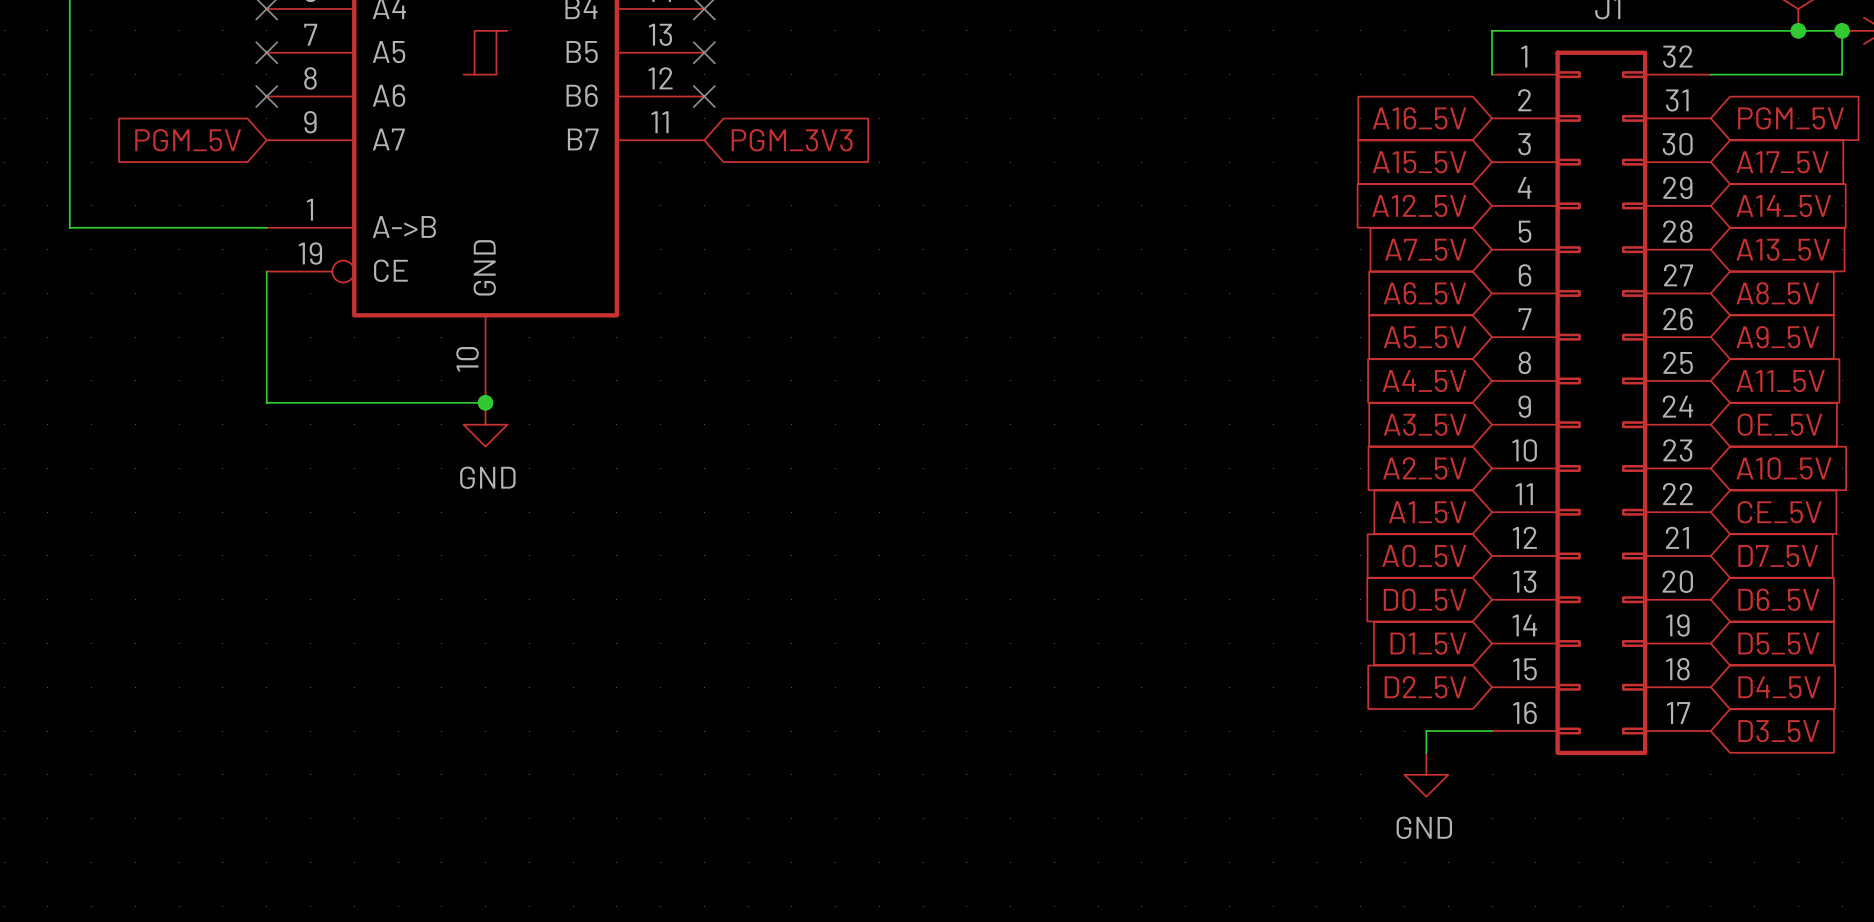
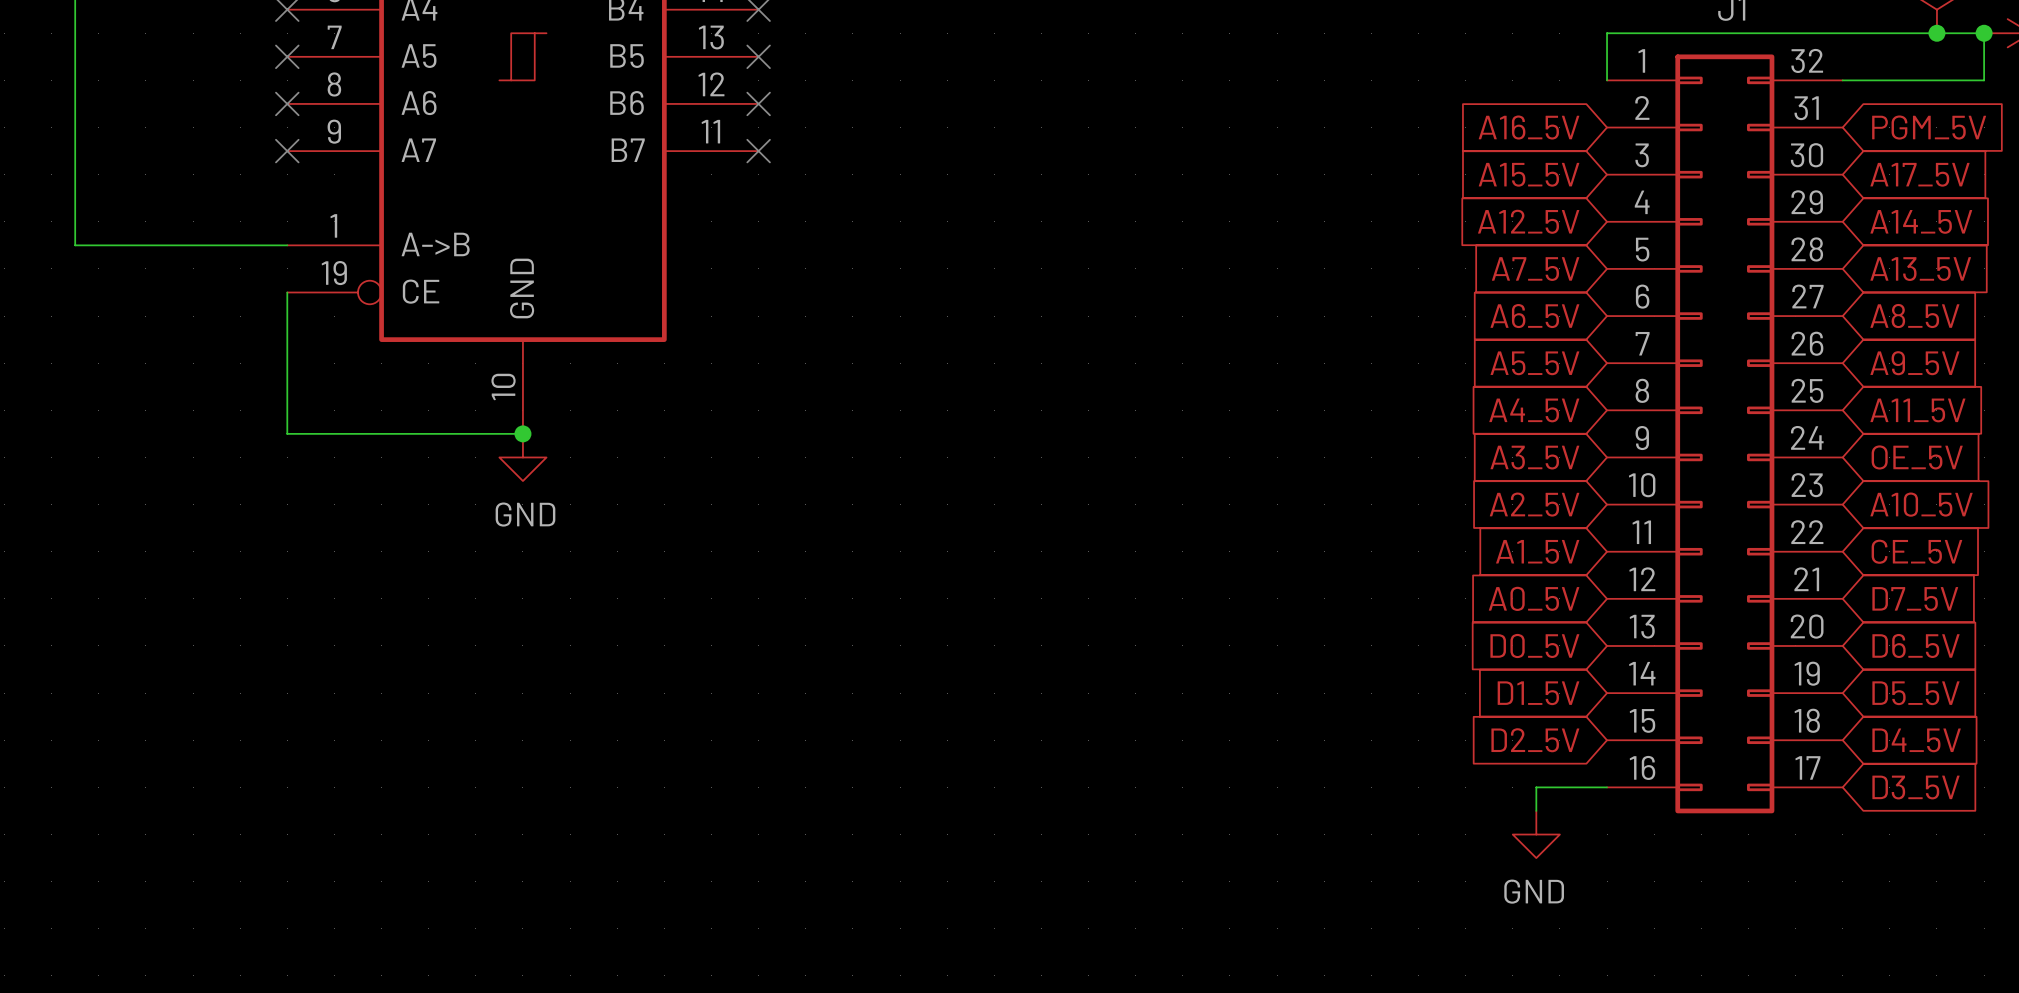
global label: PGM_5V (188, 140) -> none
no-connect mark: none -> (287, 151)
no-connect mark: none -> (758, 151)
global label: PGM_3V3 (792, 140) -> none

